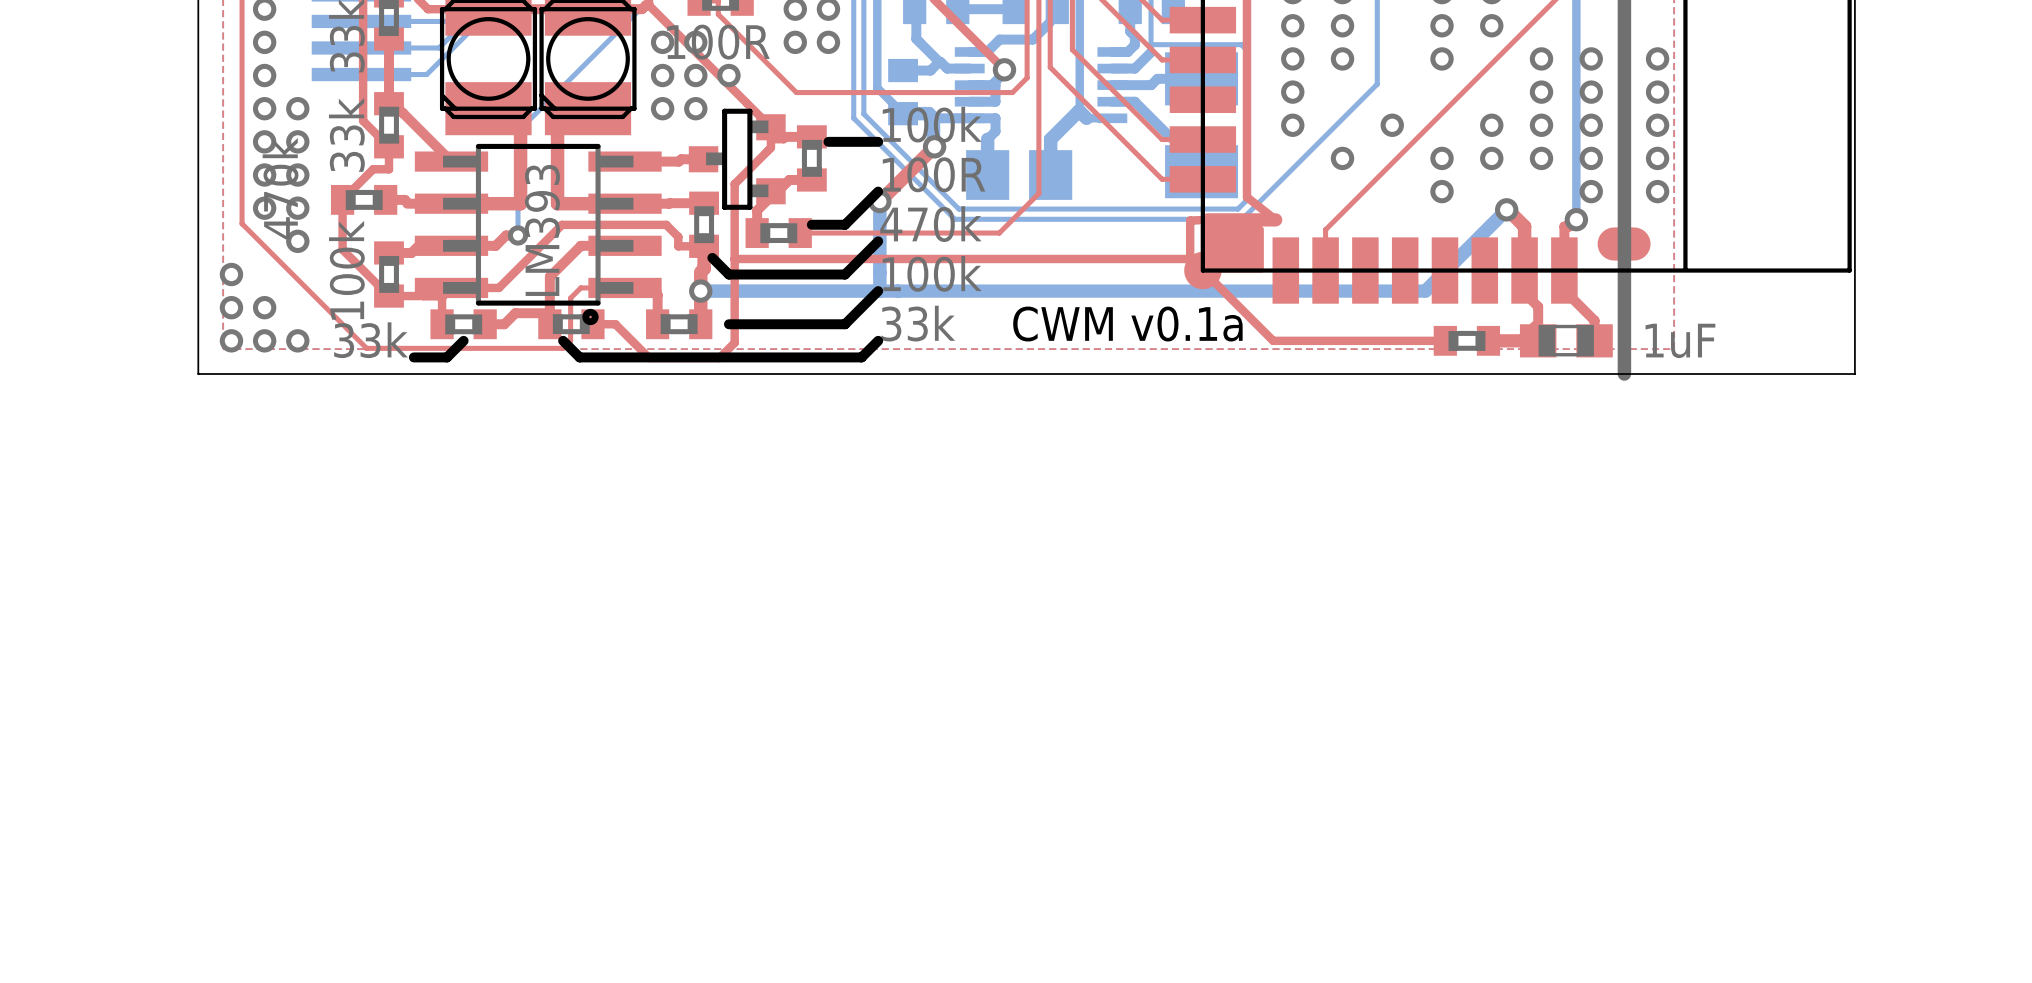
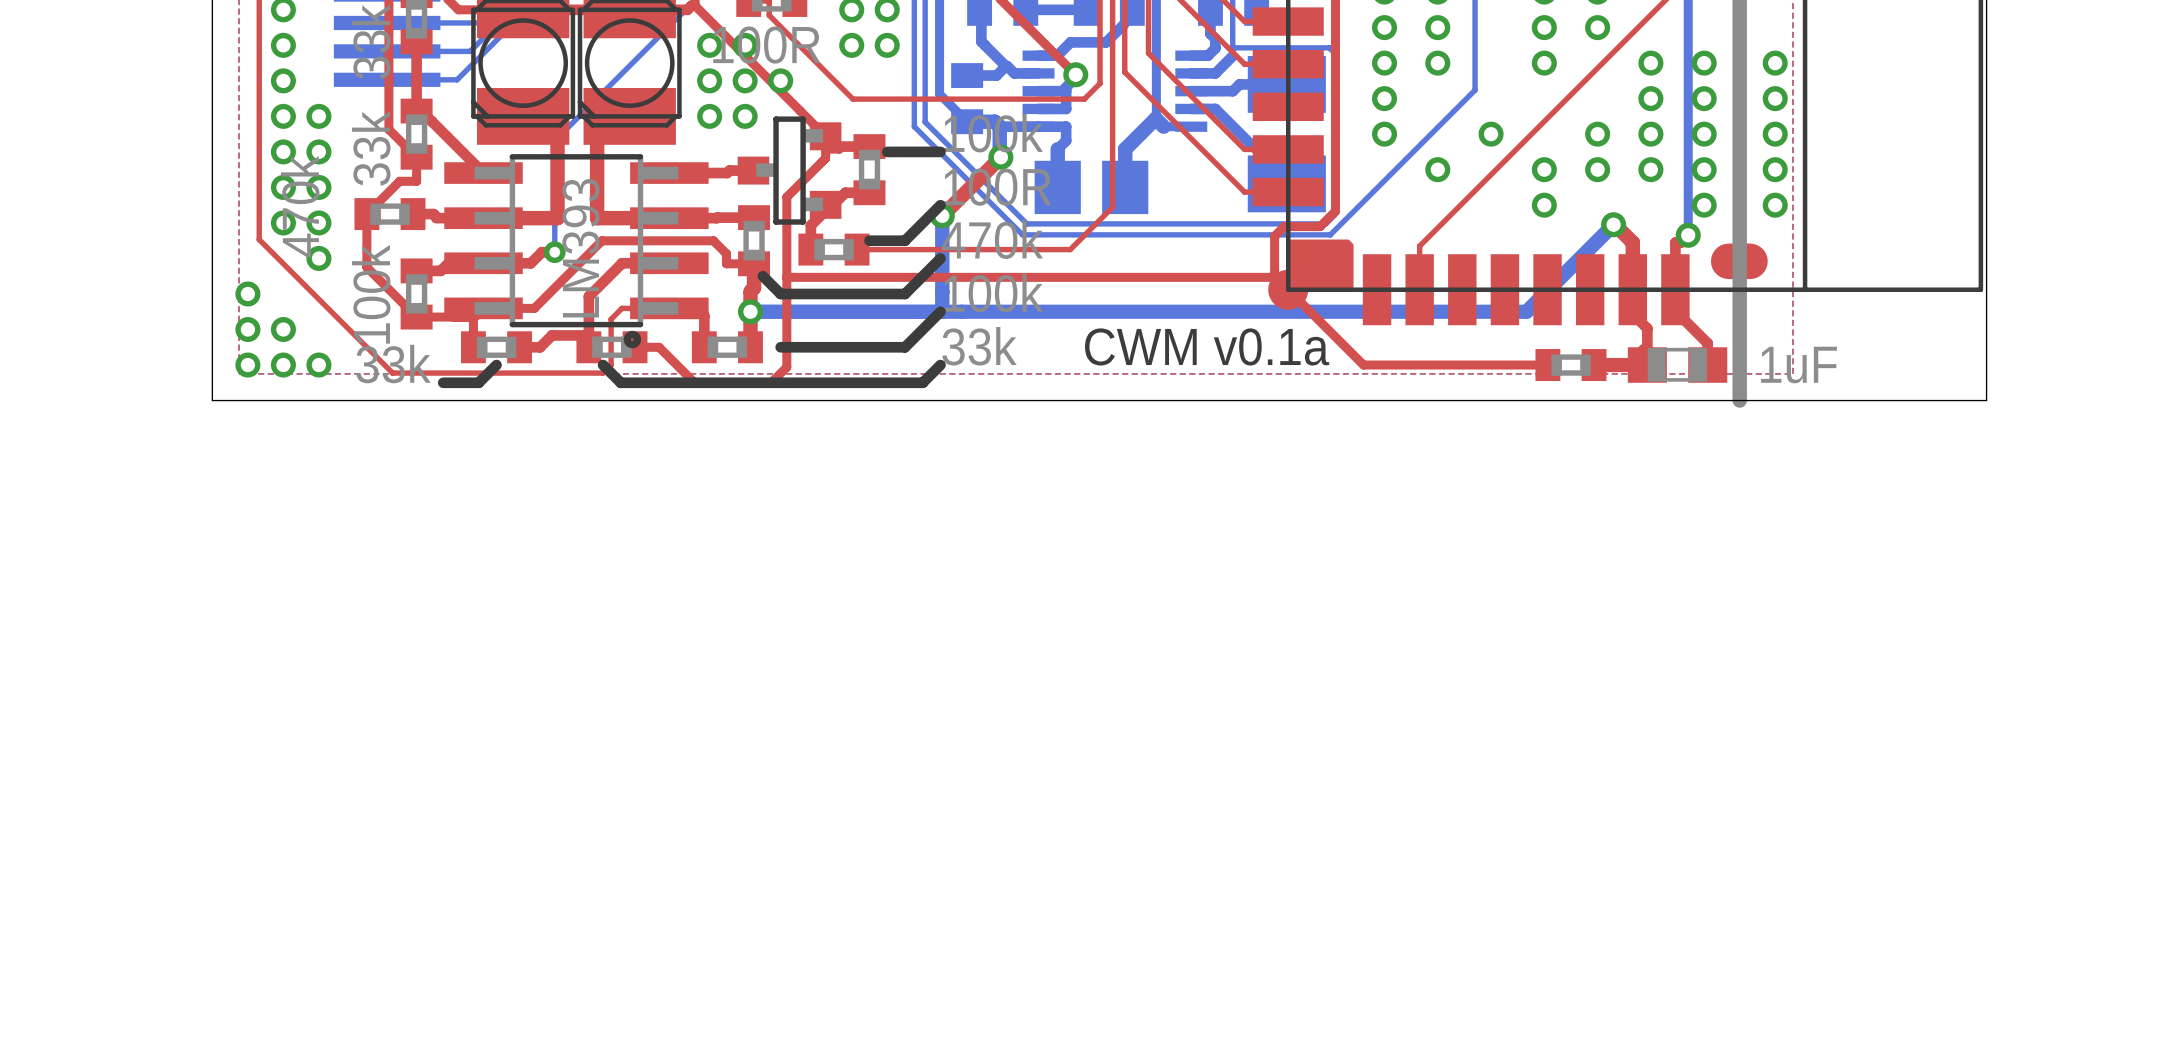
top track: (1246, 197) (1275, 219) (1190, 220) -> (1335, 211) (1320, 226) (1284, 226) (1274, 236)

